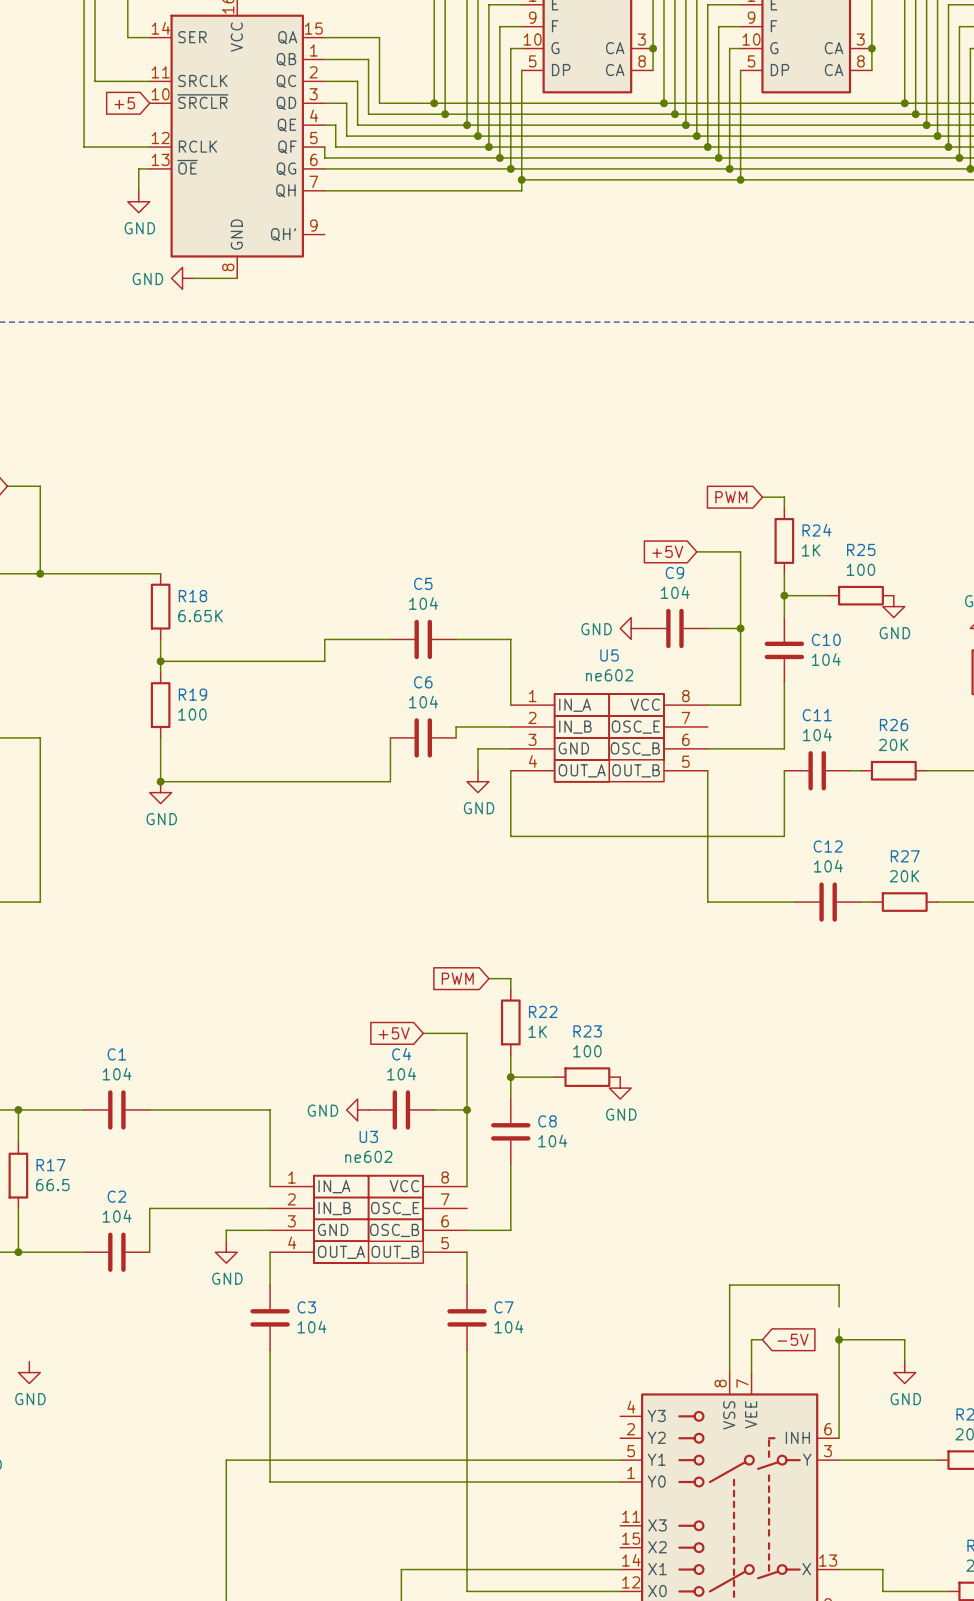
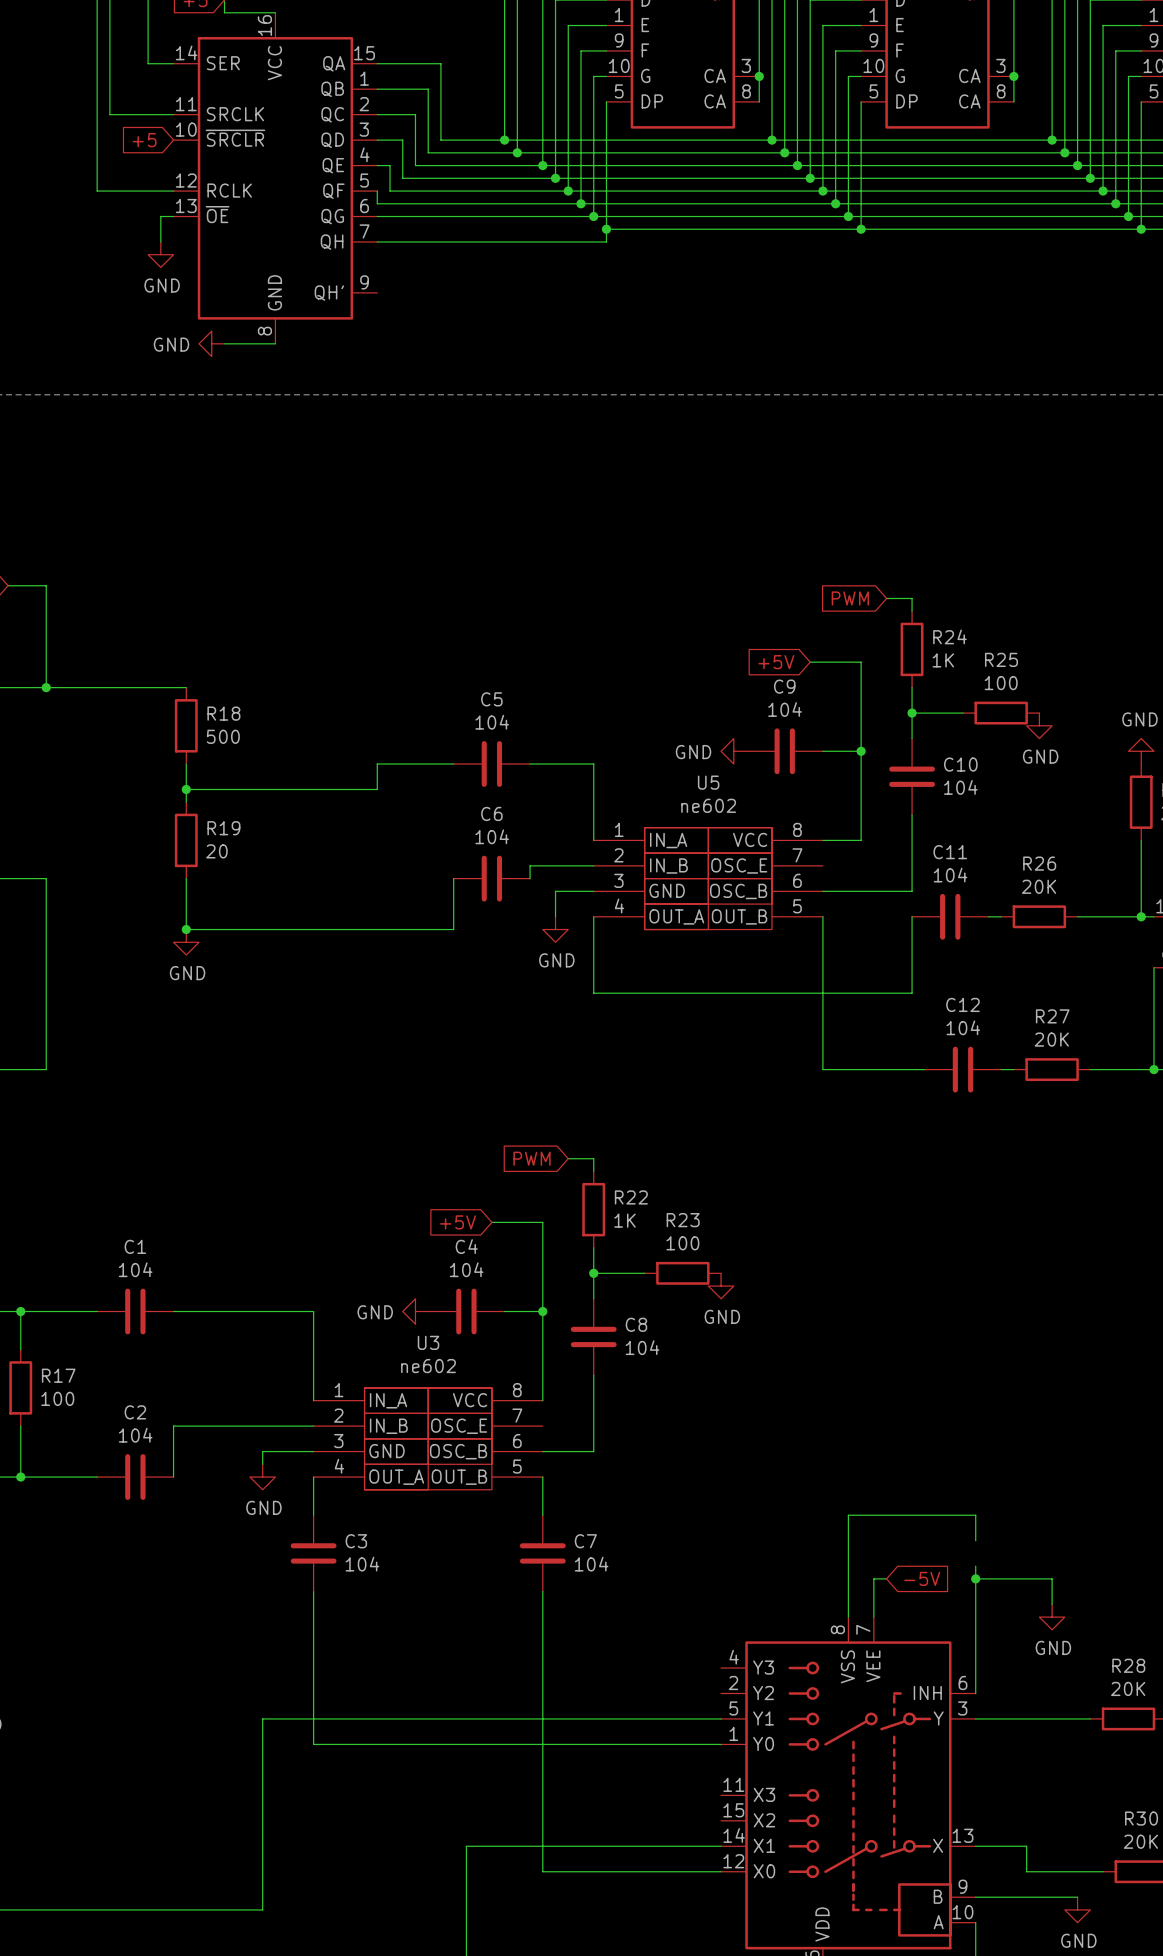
R18 value: 6.65K (200, 616) -> 500 (223, 736)
R19 value: 100 (192, 714) -> 20 (216, 851)
R17 value: 66.5 (52, 1185) -> 100 (57, 1398)
power symbol: GND (29, 1372) -> none

